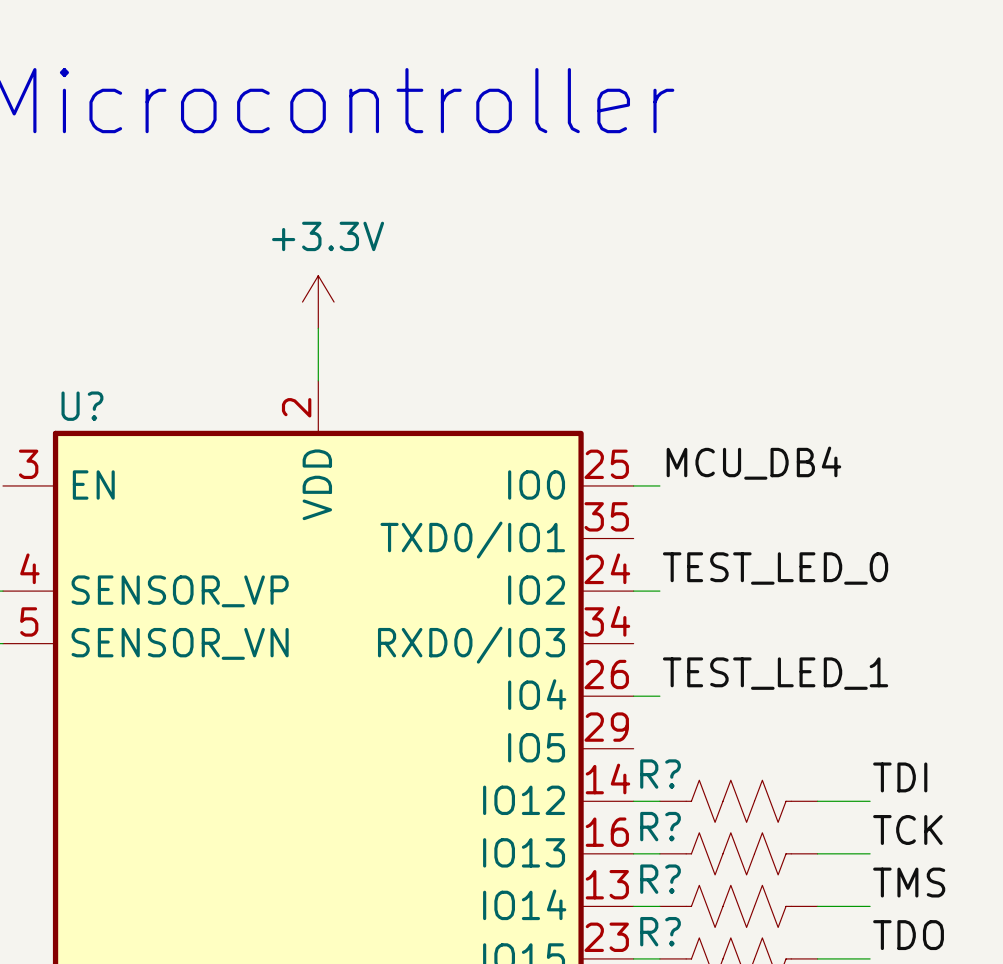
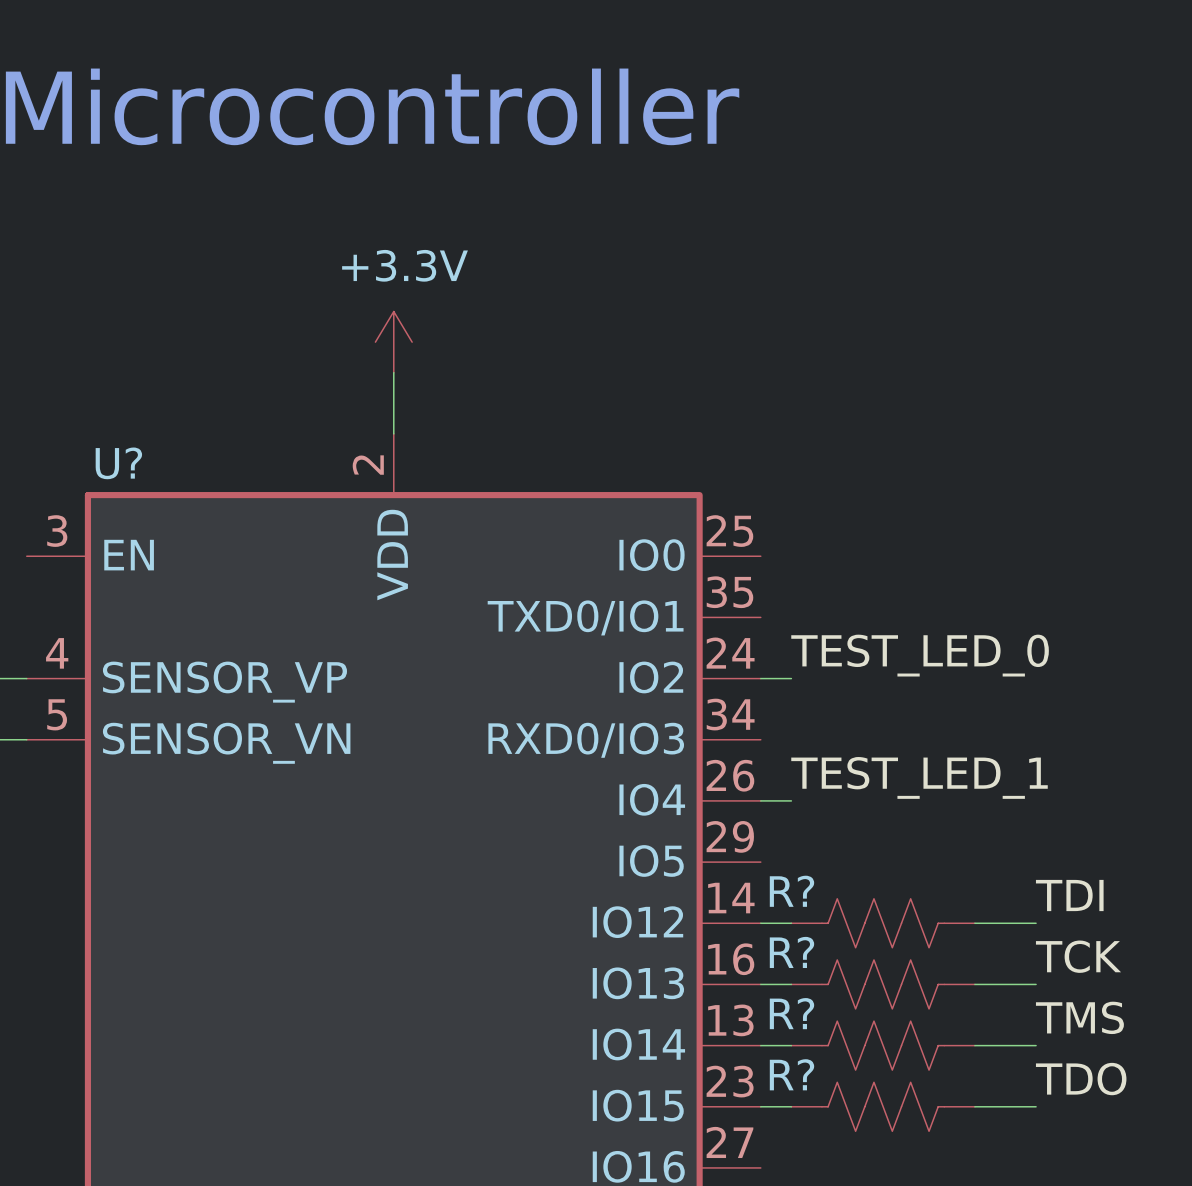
label: MCU_DB4 (753, 463) -> none
wire: (633, 485) (659, 485) -> none

